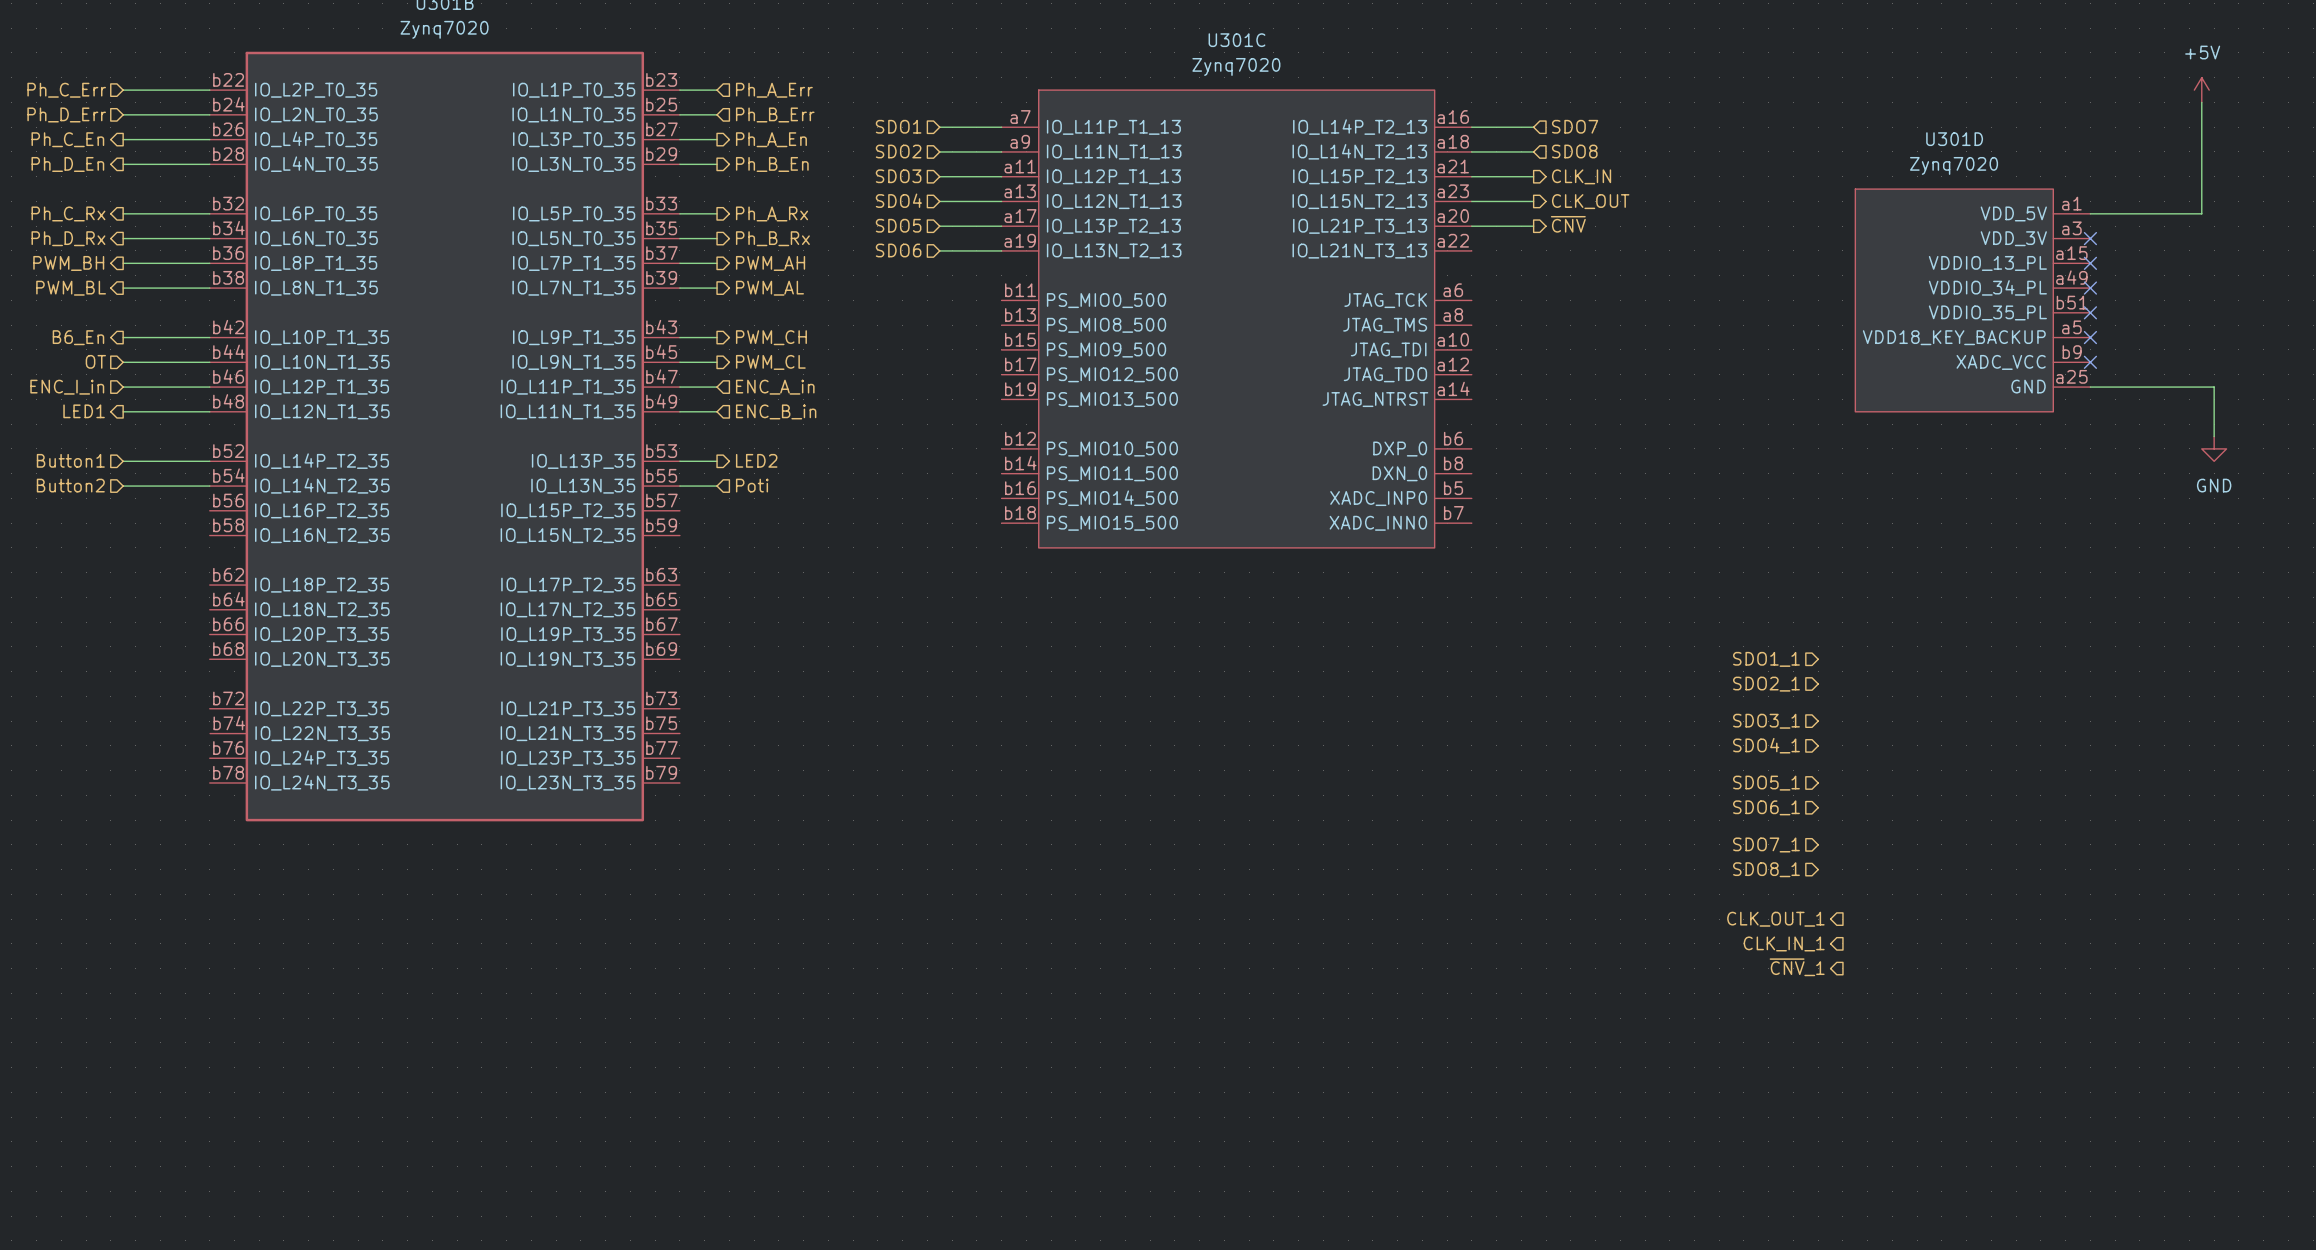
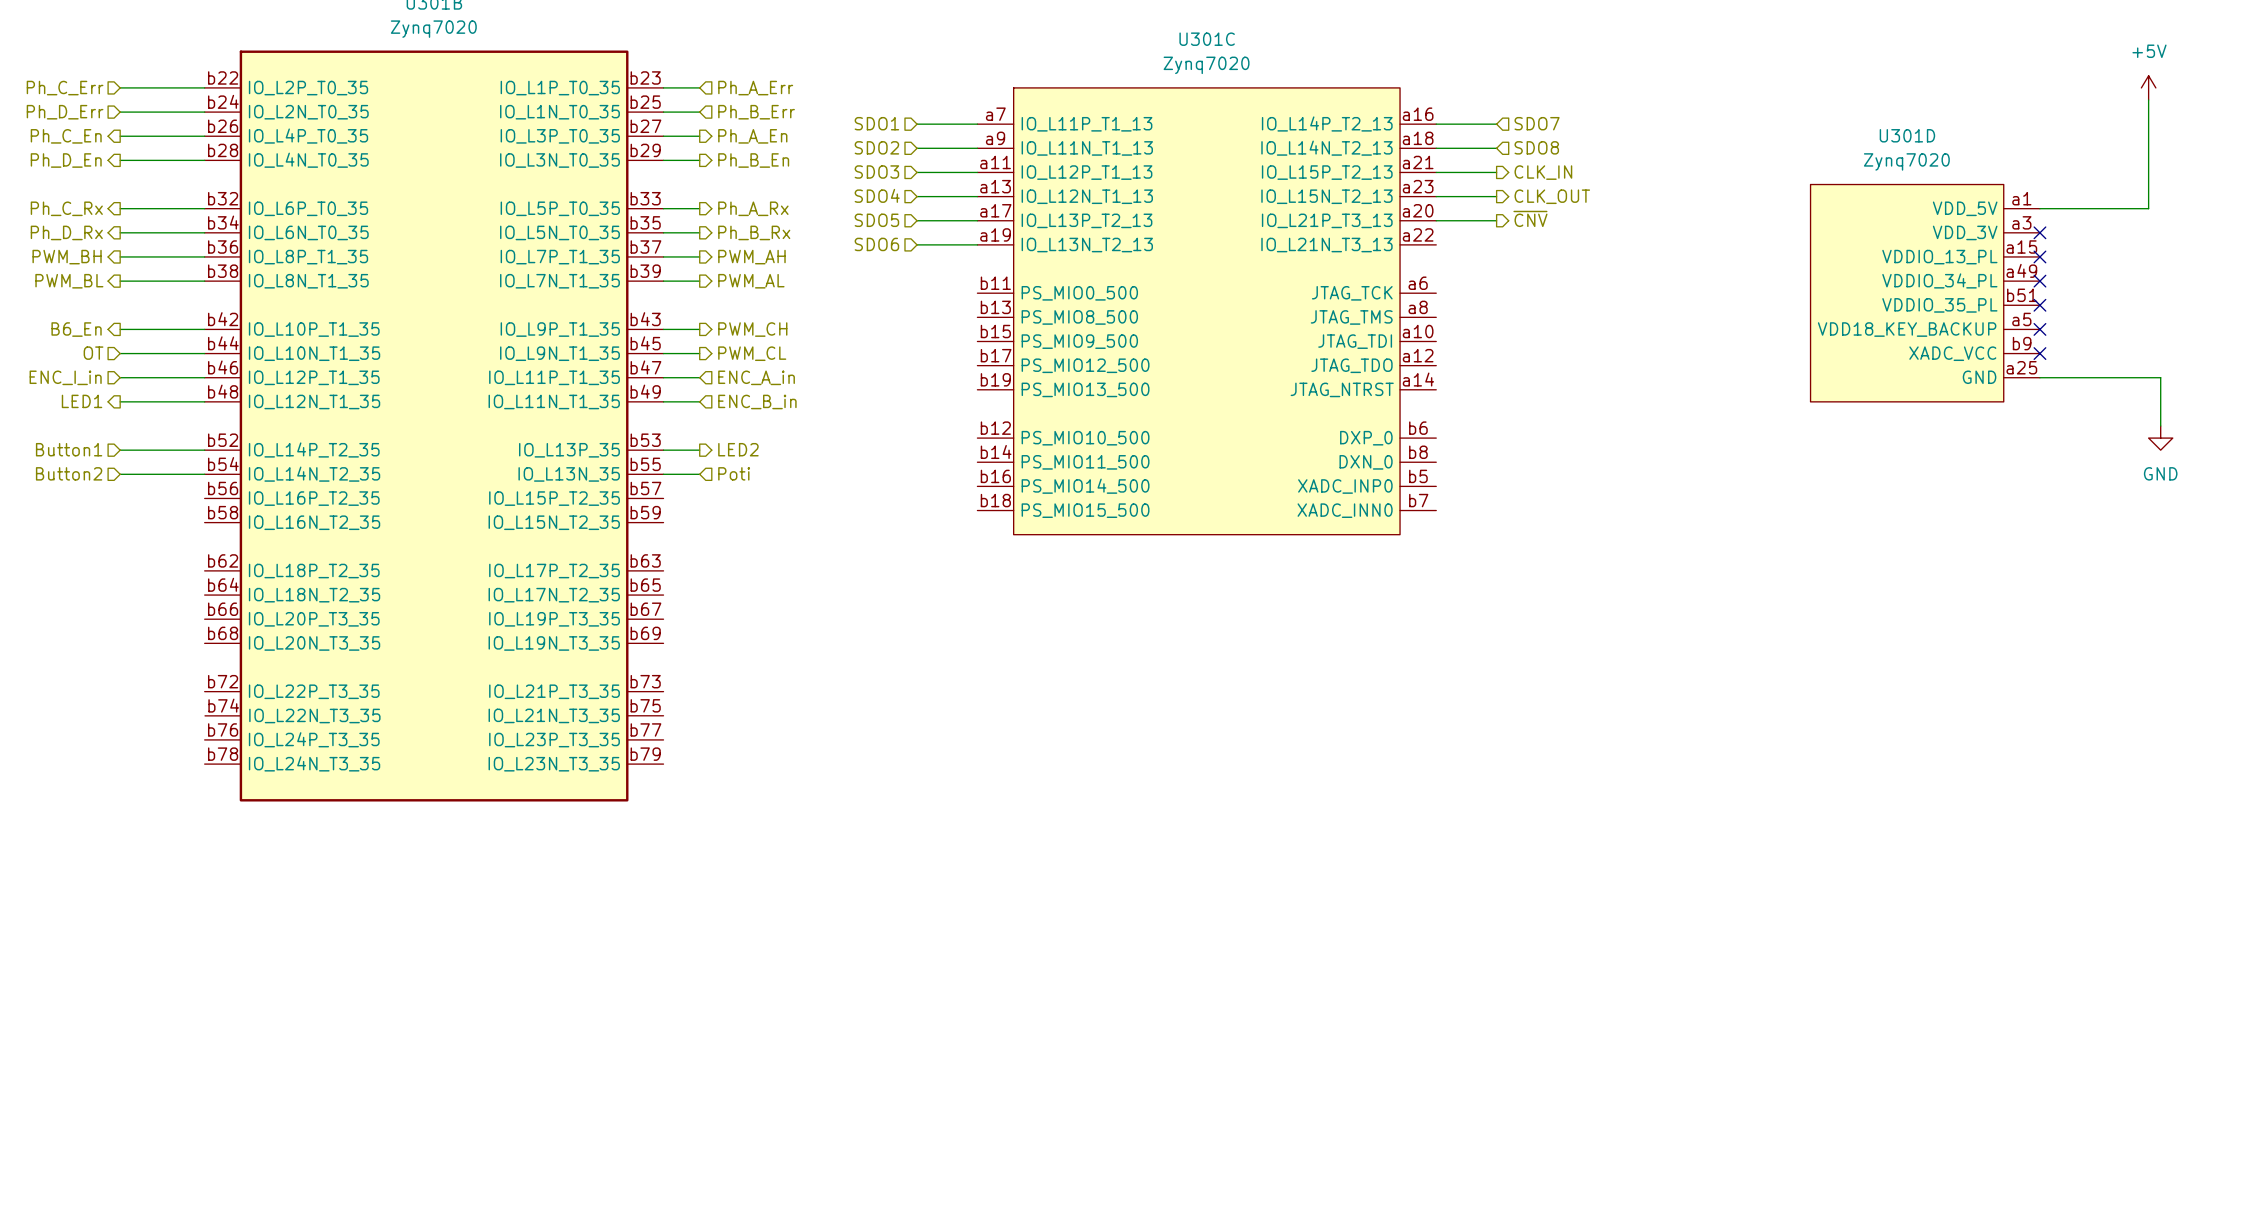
hierarchical label: SDO1_1 (1766, 659) -> none
hierarchical label: SDO2_1 (1766, 684) -> none
hierarchical label: SDO3_1 (1766, 721) -> none
hierarchical label: SDO4_1 (1766, 745) -> none
hierarchical label: SDO5_1 (1766, 783) -> none
hierarchical label: SDO6_1 (1766, 807) -> none
hierarchical label: SDO7_1 (1766, 844) -> none
hierarchical label: SDO8_1 (1766, 869) -> none
hierarchical label: CLK_OUT_1 (1775, 919) -> none
hierarchical label: CLK_IN_1 (1784, 943) -> none
hierarchical label: ~{CNV}_1 (1797, 967) -> none

